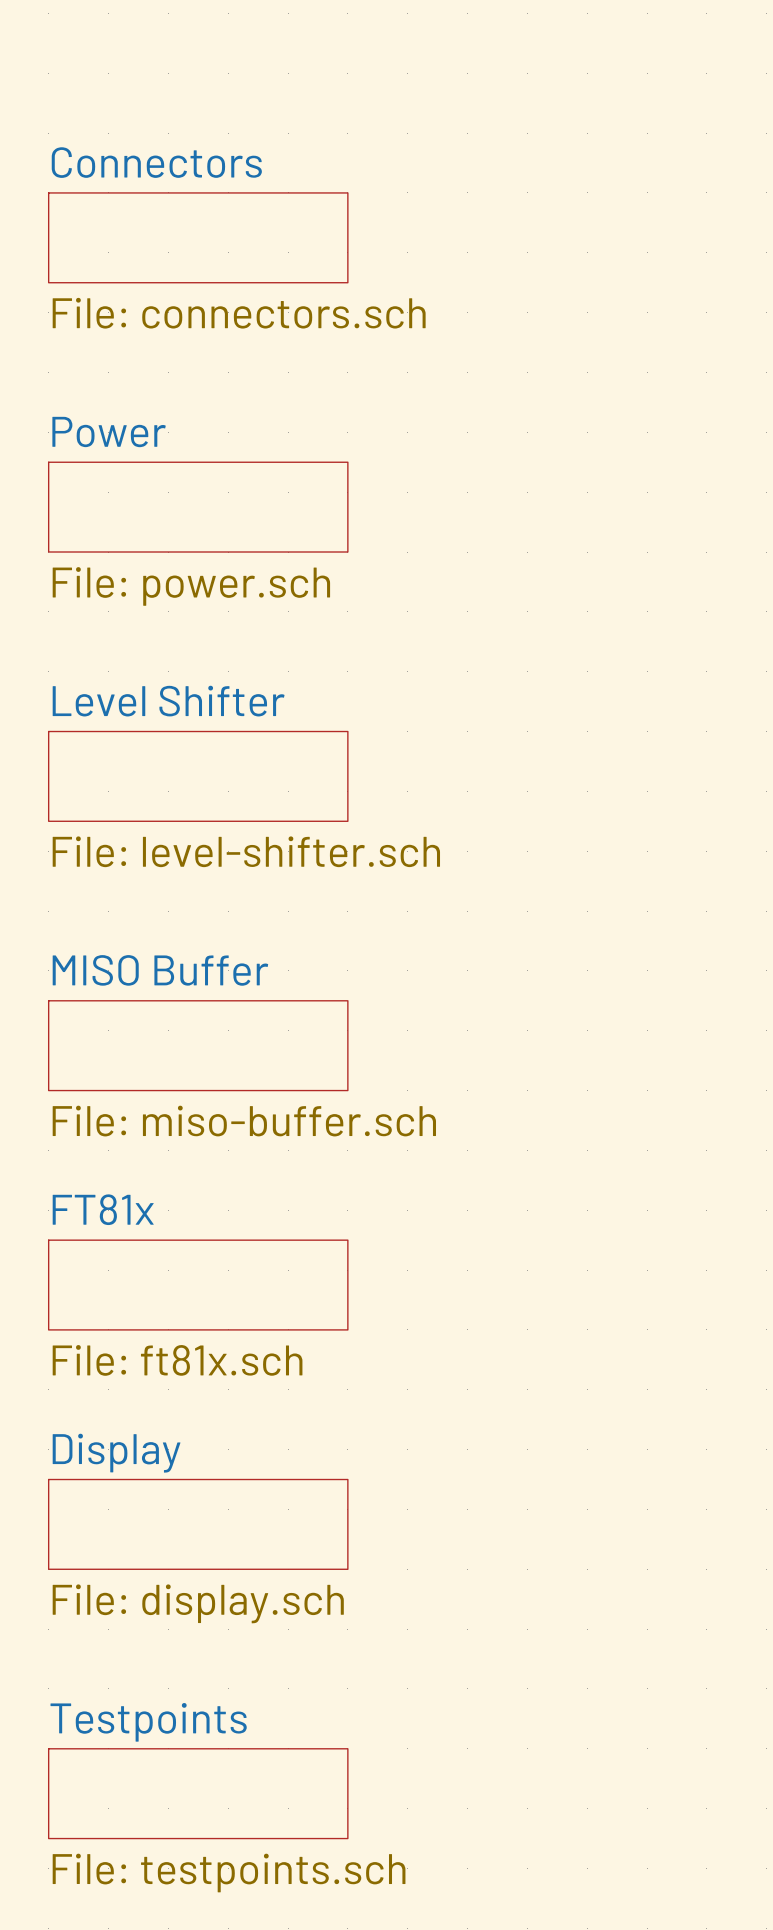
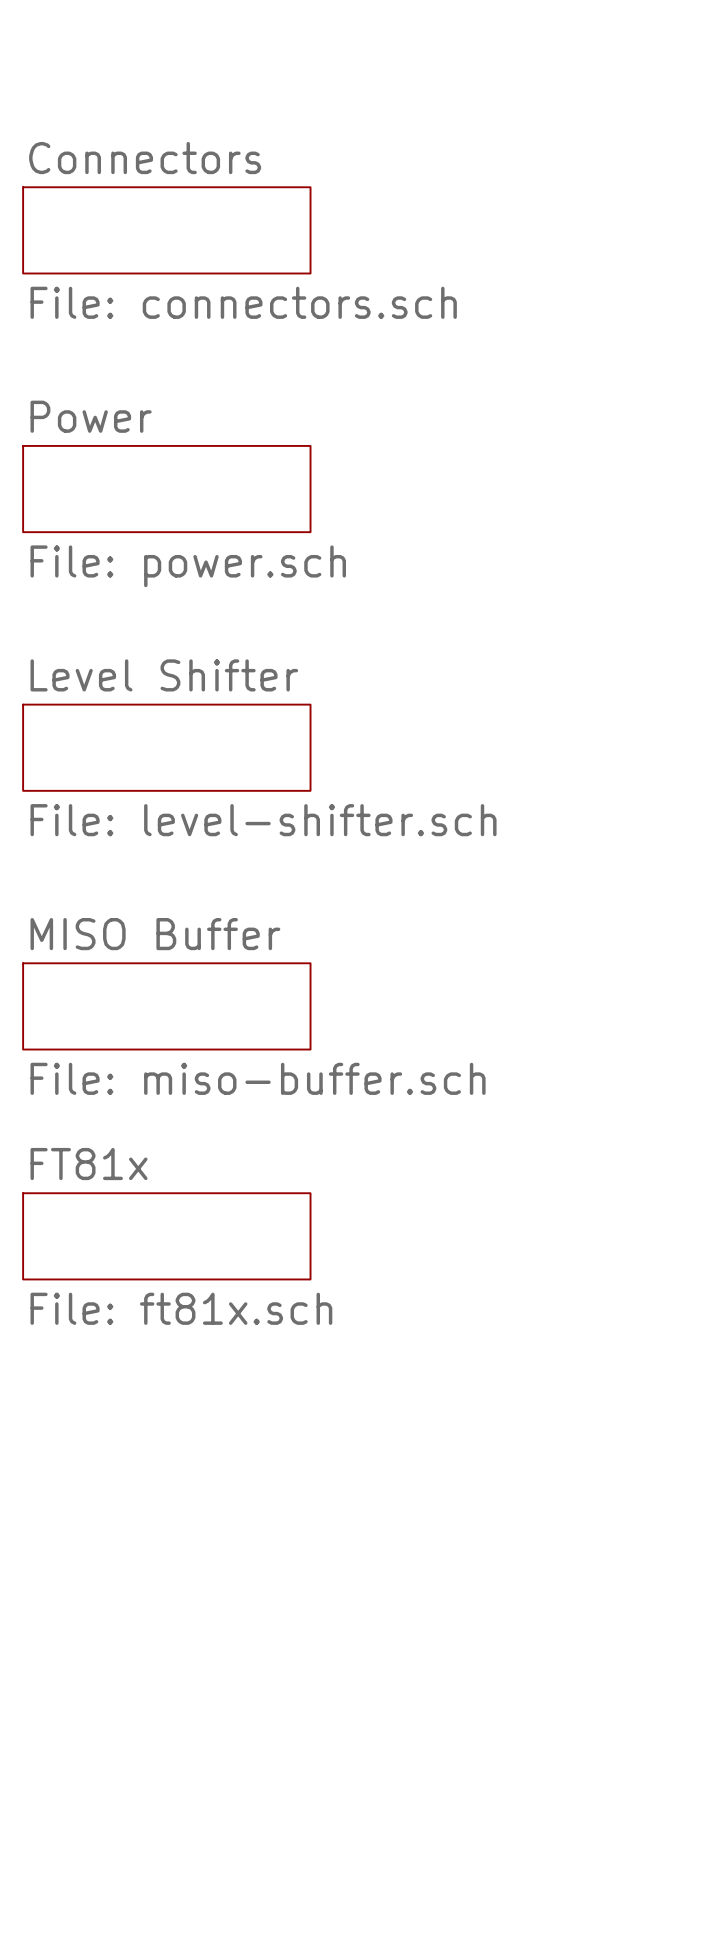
sheet Display: File: display.sch (198, 1524) -> none
sheet Testpoints: File: testpoints.sch (198, 1793) -> none

